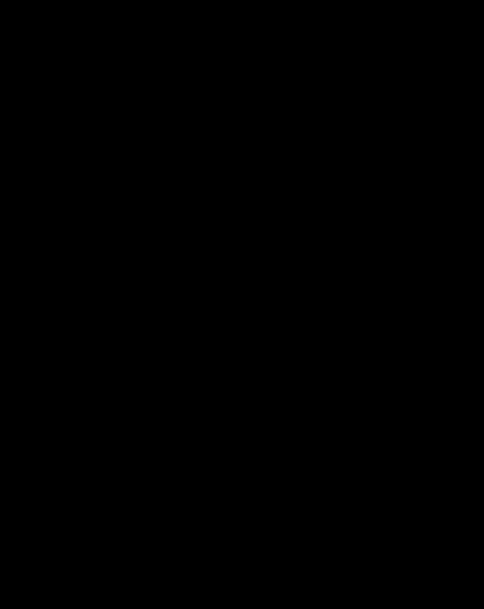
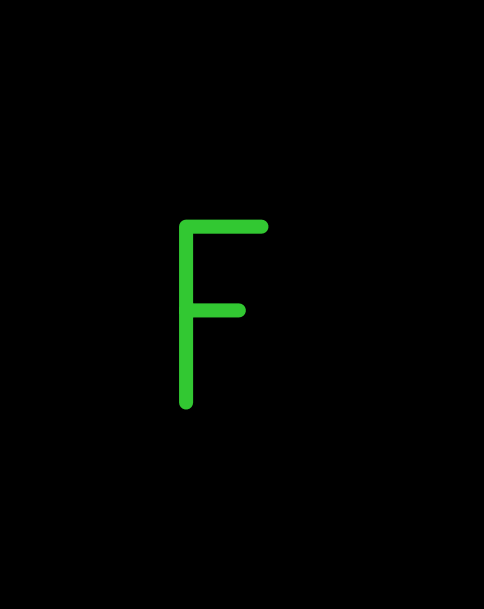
text: none -> F (223, 314)

